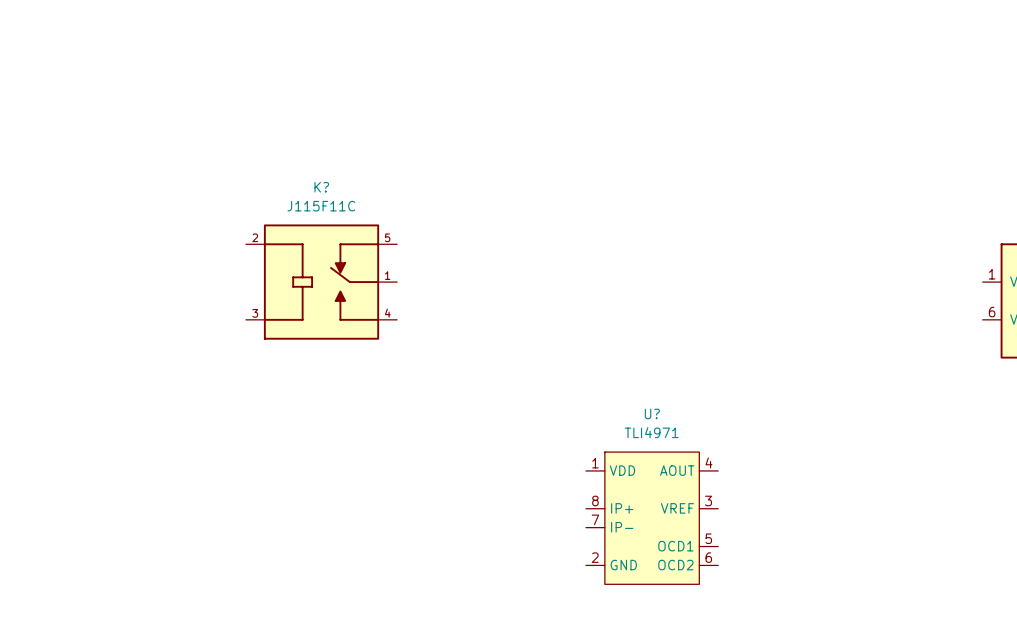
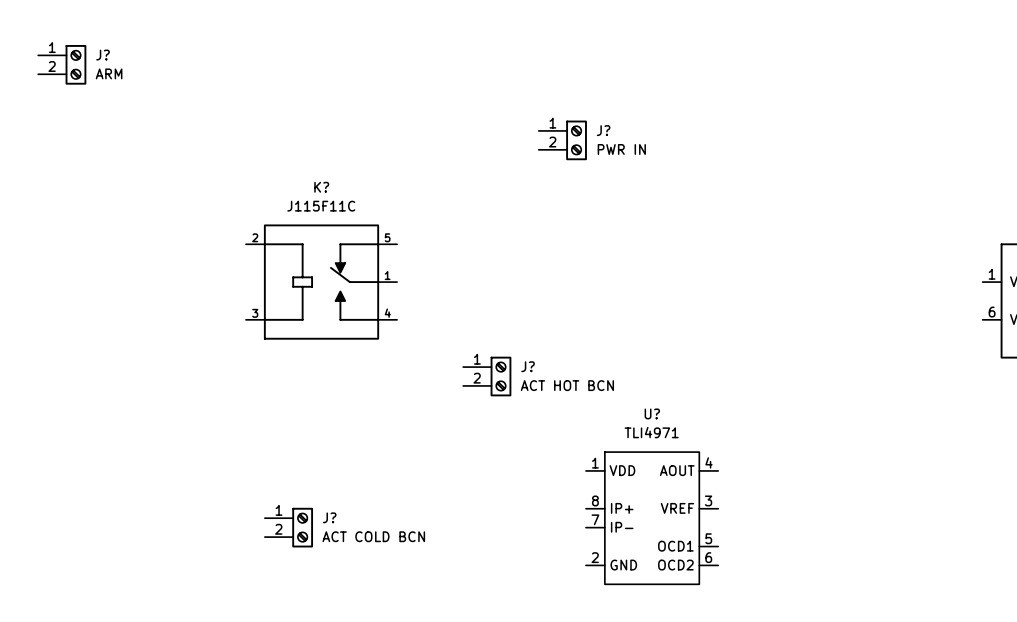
J?: none -> ARM (62, 64)
J?: none -> PWR IN (562, 140)
J?: none -> ACT HOT BCN (487, 376)
J?: none -> ACT COLD BCN (288, 527)

